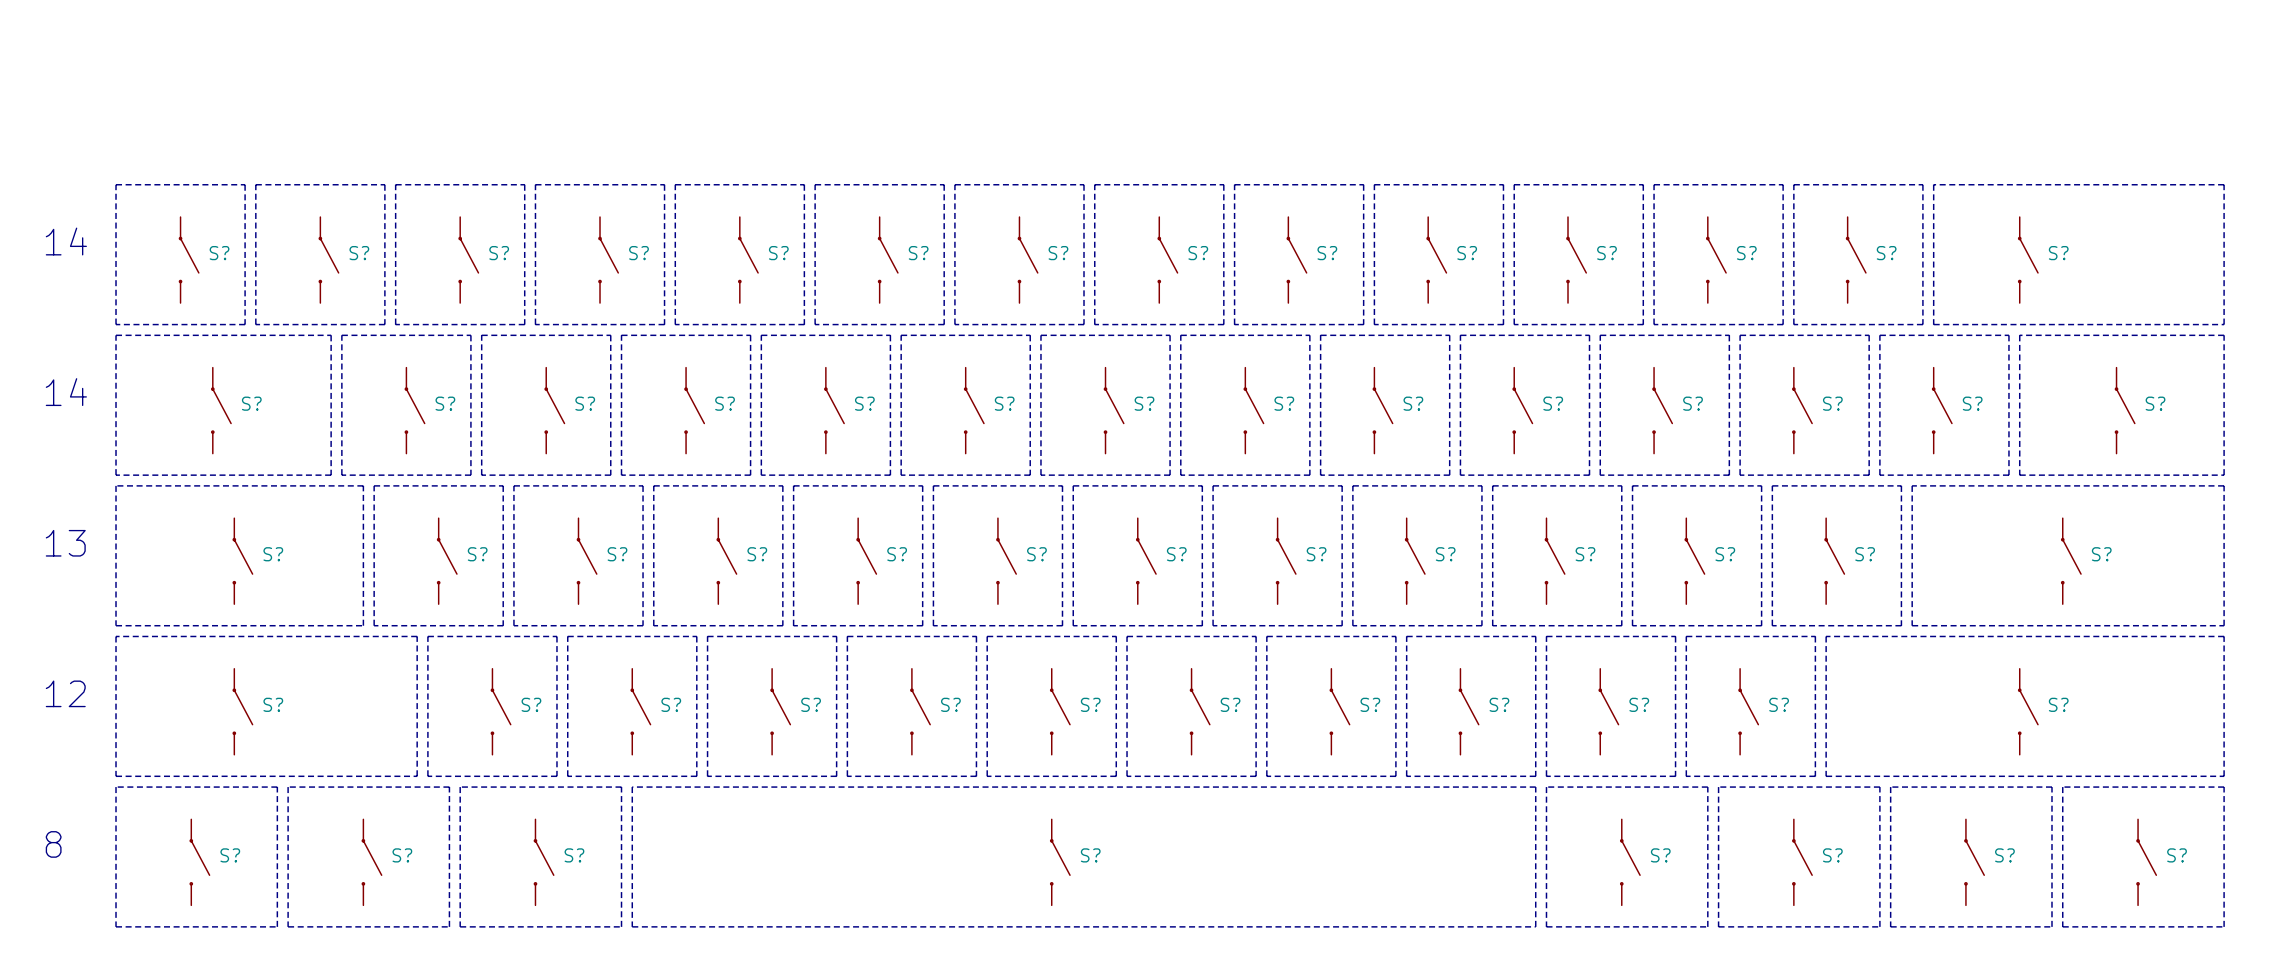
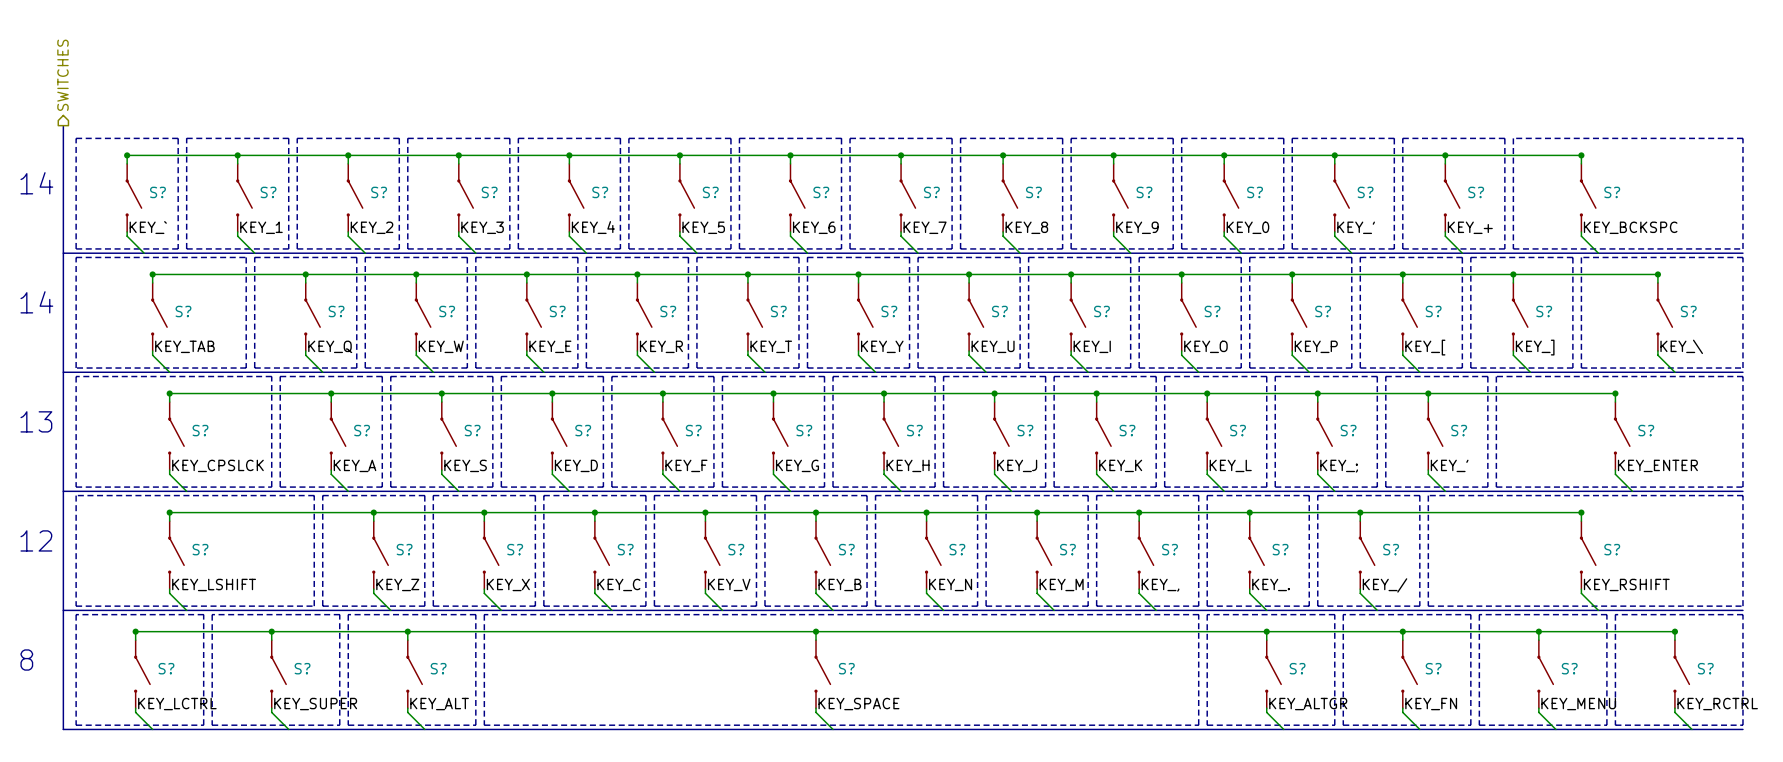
hierarchical label: none -> SWITCHES (62, 75)
bus: none -> (63, 125) (63, 729) (1742, 729)
junction: none -> (127, 155)
wire: none -> (237, 155) (237, 163)
junction: none -> (237, 155)
wire: none -> (348, 155) (348, 163)
junction: none -> (348, 155)
wire: none -> (458, 155) (458, 163)
junction: none -> (458, 155)
wire: none -> (569, 155) (569, 163)
junction: none -> (569, 155)
wire: none -> (679, 155) (679, 163)
junction: none -> (679, 155)
wire: none -> (790, 155) (790, 163)
junction: none -> (790, 155)
wire: none -> (901, 155) (901, 163)
junction: none -> (901, 155)
wire: none -> (1003, 155) (1003, 163)
junction: none -> (1003, 155)
wire: none -> (1113, 155) (1113, 163)
junction: none -> (1113, 155)
wire: none -> (1224, 155) (1224, 163)
junction: none -> (1224, 155)
wire: none -> (1334, 155) (1334, 163)
junction: none -> (1334, 155)
wire: none -> (1445, 155) (1445, 163)
junction: none -> (1445, 155)
junction: none -> (1581, 155)
wire: none -> (127, 163) (127, 155) (1581, 155) (1581, 163)
label: none -> KEY_` (148, 227)
label: none -> KEY_1 (261, 227)
label: none -> KEY_2 (372, 227)
label: none -> KEY_3 (482, 227)
label: none -> KEY_4 (593, 227)
label: none -> KEY_5 (703, 227)
label: none -> KEY_6 (814, 227)
label: none -> KEY_7 (925, 227)
label: none -> KEY_8 (1026, 227)
label: none -> KEY_9 (1137, 227)
label: none -> KEY_0 (1247, 227)
label: none -> KEY_' (1356, 227)
label: none -> KEY_+ (1470, 227)
label: none -> KEY_BCKSPC (1630, 227)
wire: none -> (127, 231) (127, 236) (144, 253)
wire: none -> (237, 231) (237, 236) (254, 253)
wire: none -> (348, 231) (348, 236) (365, 253)
wire: none -> (458, 231) (458, 236) (475, 253)
wire: none -> (569, 231) (569, 236) (586, 253)
wire: none -> (679, 231) (679, 236) (696, 253)
wire: none -> (790, 231) (790, 236) (807, 253)
wire: none -> (901, 231) (901, 236) (918, 253)
wire: none -> (1003, 231) (1003, 236) (1020, 253)
wire: none -> (1113, 231) (1113, 236) (1130, 253)
wire: none -> (1224, 231) (1224, 236) (1241, 253)
wire: none -> (1334, 231) (1334, 236) (1351, 253)
wire: none -> (1445, 231) (1445, 236) (1462, 253)
wire: none -> (1581, 231) (1581, 236) (1598, 253)
bus: none -> (63, 253) (1742, 253)
junction: none -> (152, 274)
wire: none -> (305, 274) (305, 282)
junction: none -> (305, 274)
wire: none -> (416, 274) (416, 282)
junction: none -> (416, 274)
wire: none -> (526, 274) (526, 282)
junction: none -> (526, 274)
wire: none -> (637, 274) (637, 282)
junction: none -> (637, 274)
wire: none -> (747, 274) (747, 282)
junction: none -> (747, 274)
wire: none -> (858, 274) (858, 282)
junction: none -> (858, 274)
wire: none -> (969, 274) (969, 282)
junction: none -> (969, 274)
wire: none -> (1071, 274) (1071, 282)
junction: none -> (1071, 274)
wire: none -> (1181, 274) (1181, 282)
junction: none -> (1181, 274)
wire: none -> (1292, 274) (1292, 282)
junction: none -> (1292, 274)
wire: none -> (1402, 274) (1402, 282)
junction: none -> (1402, 274)
wire: none -> (1513, 274) (1513, 282)
junction: none -> (1513, 274)
junction: none -> (1657, 274)
wire: none -> (152, 282) (152, 274) (1657, 274) (1657, 282)
label: none -> KEY_TAB (184, 346)
label: none -> KEY_Q (330, 346)
label: none -> KEY_W (441, 346)
label: none -> KEY_E (550, 346)
label: none -> KEY_R (661, 346)
label: none -> KEY_T (771, 346)
label: none -> KEY_Y (882, 346)
label: none -> KEY_U (993, 346)
label: none -> KEY_I (1092, 346)
label: none -> KEY_O (1205, 346)
label: none -> KEY_P (1316, 346)
label: none -> KEY_\ (1681, 346)
label: none -> KEY_[ (1425, 347)
label: none -> KEY_] (1535, 347)
wire: none -> (152, 351) (152, 355) (169, 372)
wire: none -> (305, 351) (305, 355) (322, 372)
wire: none -> (416, 351) (416, 355) (433, 372)
wire: none -> (526, 351) (526, 355) (543, 372)
wire: none -> (637, 351) (637, 355) (654, 372)
wire: none -> (747, 351) (747, 355) (764, 372)
wire: none -> (858, 351) (858, 355) (875, 372)
wire: none -> (969, 351) (969, 355) (986, 372)
wire: none -> (1071, 351) (1071, 355) (1088, 372)
wire: none -> (1181, 351) (1181, 355) (1198, 372)
wire: none -> (1292, 351) (1292, 355) (1309, 372)
wire: none -> (1402, 351) (1402, 355) (1419, 372)
wire: none -> (1513, 351) (1513, 355) (1530, 372)
wire: none -> (1657, 351) (1657, 355) (1674, 372)
bus: none -> (63, 372) (1742, 372)
junction: none -> (169, 393)
wire: none -> (331, 393) (331, 402)
junction: none -> (331, 393)
wire: none -> (441, 393) (441, 402)
junction: none -> (441, 393)
wire: none -> (552, 393) (552, 402)
junction: none -> (552, 393)
wire: none -> (662, 393) (662, 402)
junction: none -> (662, 393)
wire: none -> (773, 393) (773, 402)
junction: none -> (773, 393)
wire: none -> (884, 393) (884, 402)
junction: none -> (884, 393)
wire: none -> (994, 393) (994, 402)
junction: none -> (994, 393)
wire: none -> (1096, 393) (1096, 402)
junction: none -> (1096, 393)
wire: none -> (1207, 393) (1207, 402)
junction: none -> (1207, 393)
wire: none -> (1317, 393) (1317, 402)
junction: none -> (1317, 393)
wire: none -> (1428, 393) (1428, 402)
junction: none -> (1428, 393)
junction: none -> (1615, 393)
wire: none -> (169, 402) (169, 393) (1615, 393) (1615, 402)
label: none -> KEY_CPSLCK (217, 465)
label: none -> KEY_A (355, 465)
label: none -> KEY_S (465, 465)
label: none -> KEY_D (576, 465)
label: none -> KEY_F (686, 465)
label: none -> KEY_G (797, 465)
label: none -> KEY_H (908, 465)
label: none -> KEY_J (1017, 465)
label: none -> KEY_K (1120, 465)
label: none -> KEY_L (1230, 465)
label: none -> KEY_' (1449, 465)
label: none -> KEY_ENTER (1657, 465)
label: none -> KEY_; (1339, 466)
wire: none -> (169, 470) (169, 474) (186, 491)
wire: none -> (331, 470) (331, 474) (348, 491)
wire: none -> (441, 470) (441, 474) (458, 491)
wire: none -> (552, 470) (552, 474) (569, 491)
wire: none -> (662, 470) (662, 474) (679, 491)
wire: none -> (773, 470) (773, 474) (790, 491)
wire: none -> (884, 470) (884, 474) (901, 491)
wire: none -> (994, 470) (994, 474) (1011, 491)
wire: none -> (1096, 470) (1096, 474) (1113, 491)
wire: none -> (1207, 470) (1207, 474) (1224, 491)
wire: none -> (1317, 470) (1317, 474) (1334, 491)
wire: none -> (1428, 470) (1428, 474) (1445, 491)
wire: none -> (1615, 470) (1615, 474) (1632, 491)
bus: none -> (63, 491) (1742, 491)
junction: none -> (169, 512)
wire: none -> (373, 512) (373, 521)
junction: none -> (373, 512)
wire: none -> (484, 512) (484, 521)
junction: none -> (484, 512)
wire: none -> (594, 512) (594, 521)
junction: none -> (594, 512)
wire: none -> (705, 512) (705, 521)
junction: none -> (705, 512)
wire: none -> (816, 512) (816, 521)
junction: none -> (816, 512)
wire: none -> (926, 512) (926, 521)
junction: none -> (926, 512)
wire: none -> (1037, 512) (1037, 521)
junction: none -> (1037, 512)
wire: none -> (1139, 512) (1139, 521)
junction: none -> (1139, 512)
wire: none -> (1249, 512) (1249, 521)
junction: none -> (1249, 512)
wire: none -> (1360, 512) (1360, 521)
junction: none -> (1360, 512)
junction: none -> (1581, 512)
wire: none -> (169, 521) (169, 512) (1581, 512) (1581, 521)
label: none -> KEY_LSHIFT (214, 584)
label: none -> KEY_Z (397, 584)
label: none -> KEY_X (508, 584)
label: none -> KEY_C (618, 584)
label: none -> KEY_V (729, 584)
label: none -> KEY_B (840, 584)
label: none -> KEY_N (950, 584)
label: none -> KEY_M (1061, 584)
label: none -> KEY_, (1160, 585)
label: none -> KEY_. (1271, 584)
label: none -> KEY_RSHIFT (1626, 584)
label: none -> KEY_/ (1385, 585)
wire: none -> (169, 589) (169, 593) (186, 610)
wire: none -> (373, 589) (373, 593) (390, 610)
wire: none -> (484, 589) (484, 593) (501, 610)
wire: none -> (594, 589) (594, 593) (611, 610)
wire: none -> (705, 589) (705, 593) (722, 610)
wire: none -> (816, 589) (816, 593) (833, 610)
wire: none -> (926, 589) (926, 593) (943, 610)
wire: none -> (1037, 589) (1037, 593) (1054, 610)
wire: none -> (1139, 589) (1139, 593) (1156, 610)
wire: none -> (1249, 589) (1249, 593) (1266, 610)
wire: none -> (1360, 589) (1360, 593) (1377, 610)
wire: none -> (1581, 589) (1581, 593) (1598, 610)
bus: none -> (63, 610) (1742, 610)
junction: none -> (135, 631)
wire: none -> (271, 631) (271, 640)
junction: none -> (271, 631)
wire: none -> (407, 631) (407, 640)
junction: none -> (407, 631)
wire: none -> (816, 631) (816, 640)
junction: none -> (816, 631)
wire: none -> (1266, 631) (1266, 640)
junction: none -> (1266, 631)
wire: none -> (1402, 631) (1402, 640)
junction: none -> (1402, 631)
wire: none -> (1538, 631) (1538, 640)
junction: none -> (1538, 631)
junction: none -> (1674, 631)
wire: none -> (135, 640) (135, 631) (1674, 631) (1674, 640)
label: none -> KEY_LCTRL (177, 704)
label: none -> KEY_SUPER (315, 704)
label: none -> KEY_ALT (439, 704)
label: none -> KEY_SPACE (858, 704)
label: none -> KEY_ALTGR (1308, 704)
label: none -> KEY_FN (1431, 704)
label: none -> KEY_MENU (1578, 704)
label: none -> KEY_RCTRL (1717, 704)
wire: none -> (135, 708) (135, 712) (152, 729)
wire: none -> (271, 708) (271, 712) (288, 729)
wire: none -> (407, 708) (407, 712) (424, 729)
wire: none -> (816, 708) (816, 712) (833, 729)
wire: none -> (1266, 708) (1266, 712) (1283, 729)
wire: none -> (1402, 708) (1402, 712) (1419, 729)
wire: none -> (1538, 708) (1538, 712) (1555, 729)
wire: none -> (1674, 708) (1674, 712) (1691, 729)

